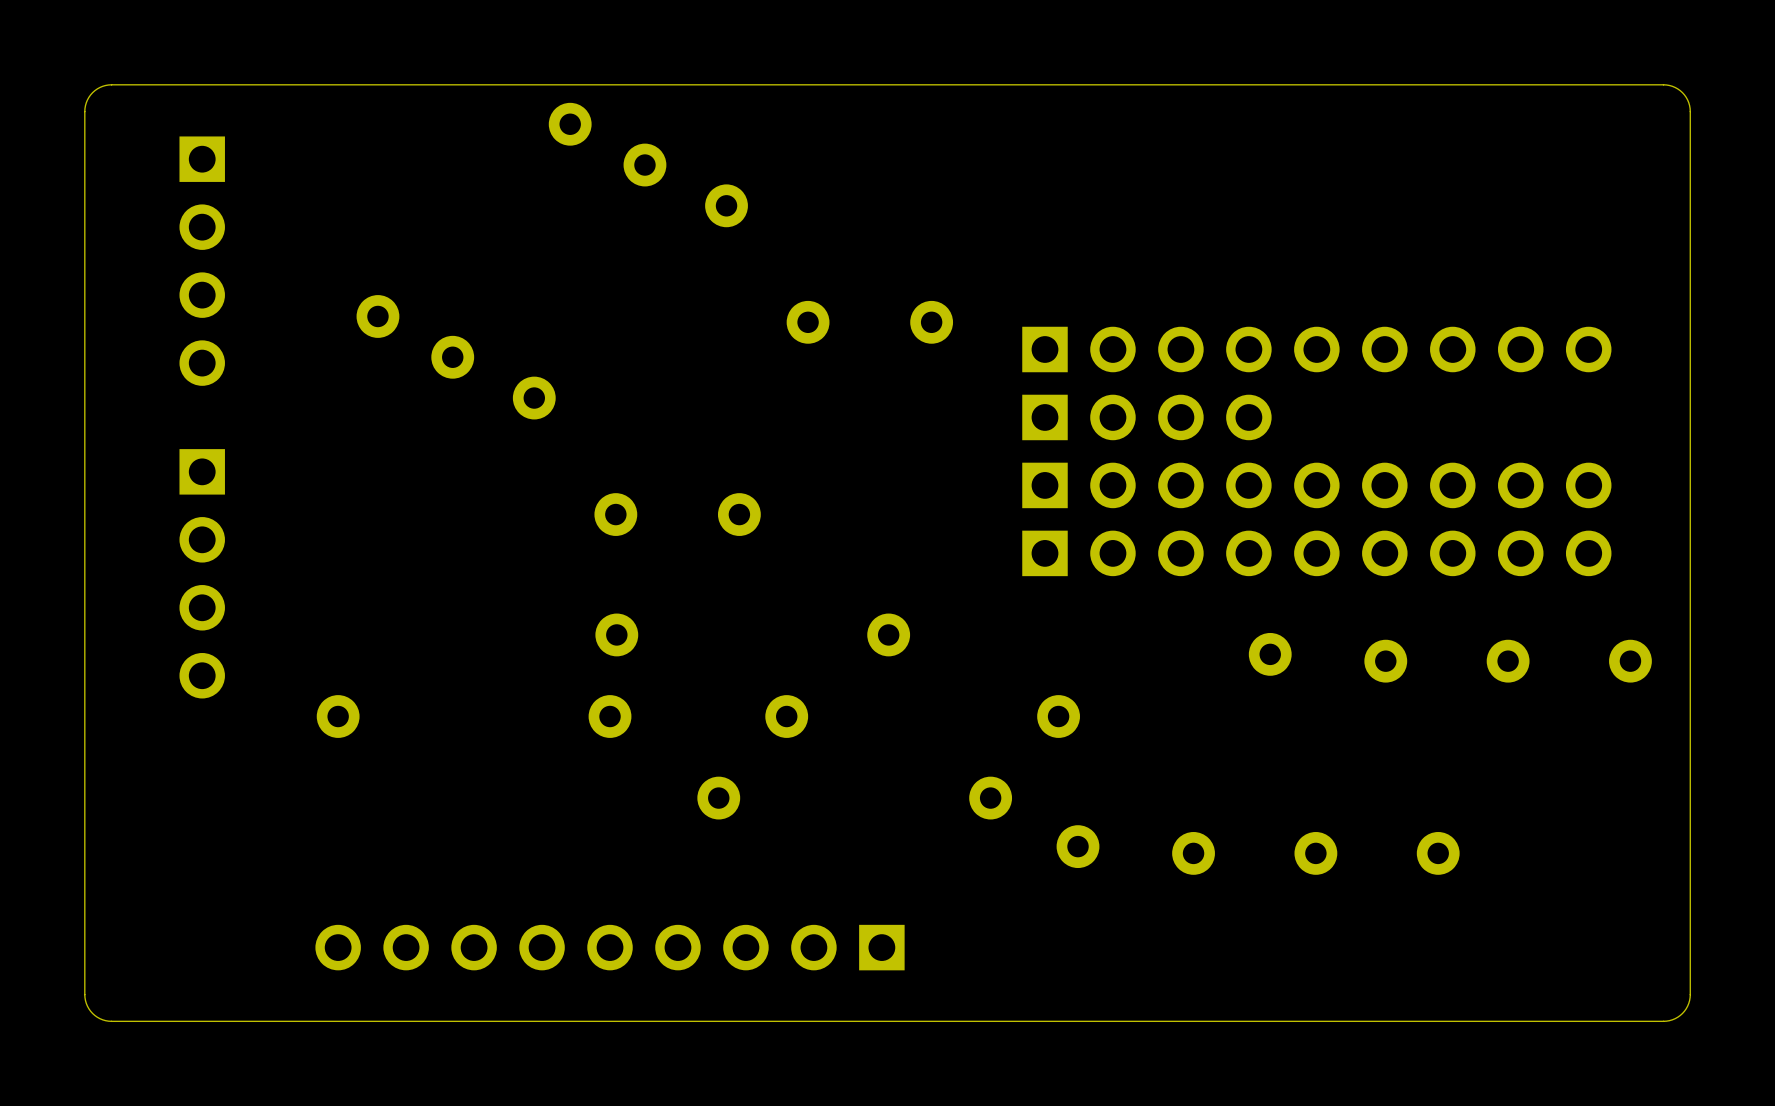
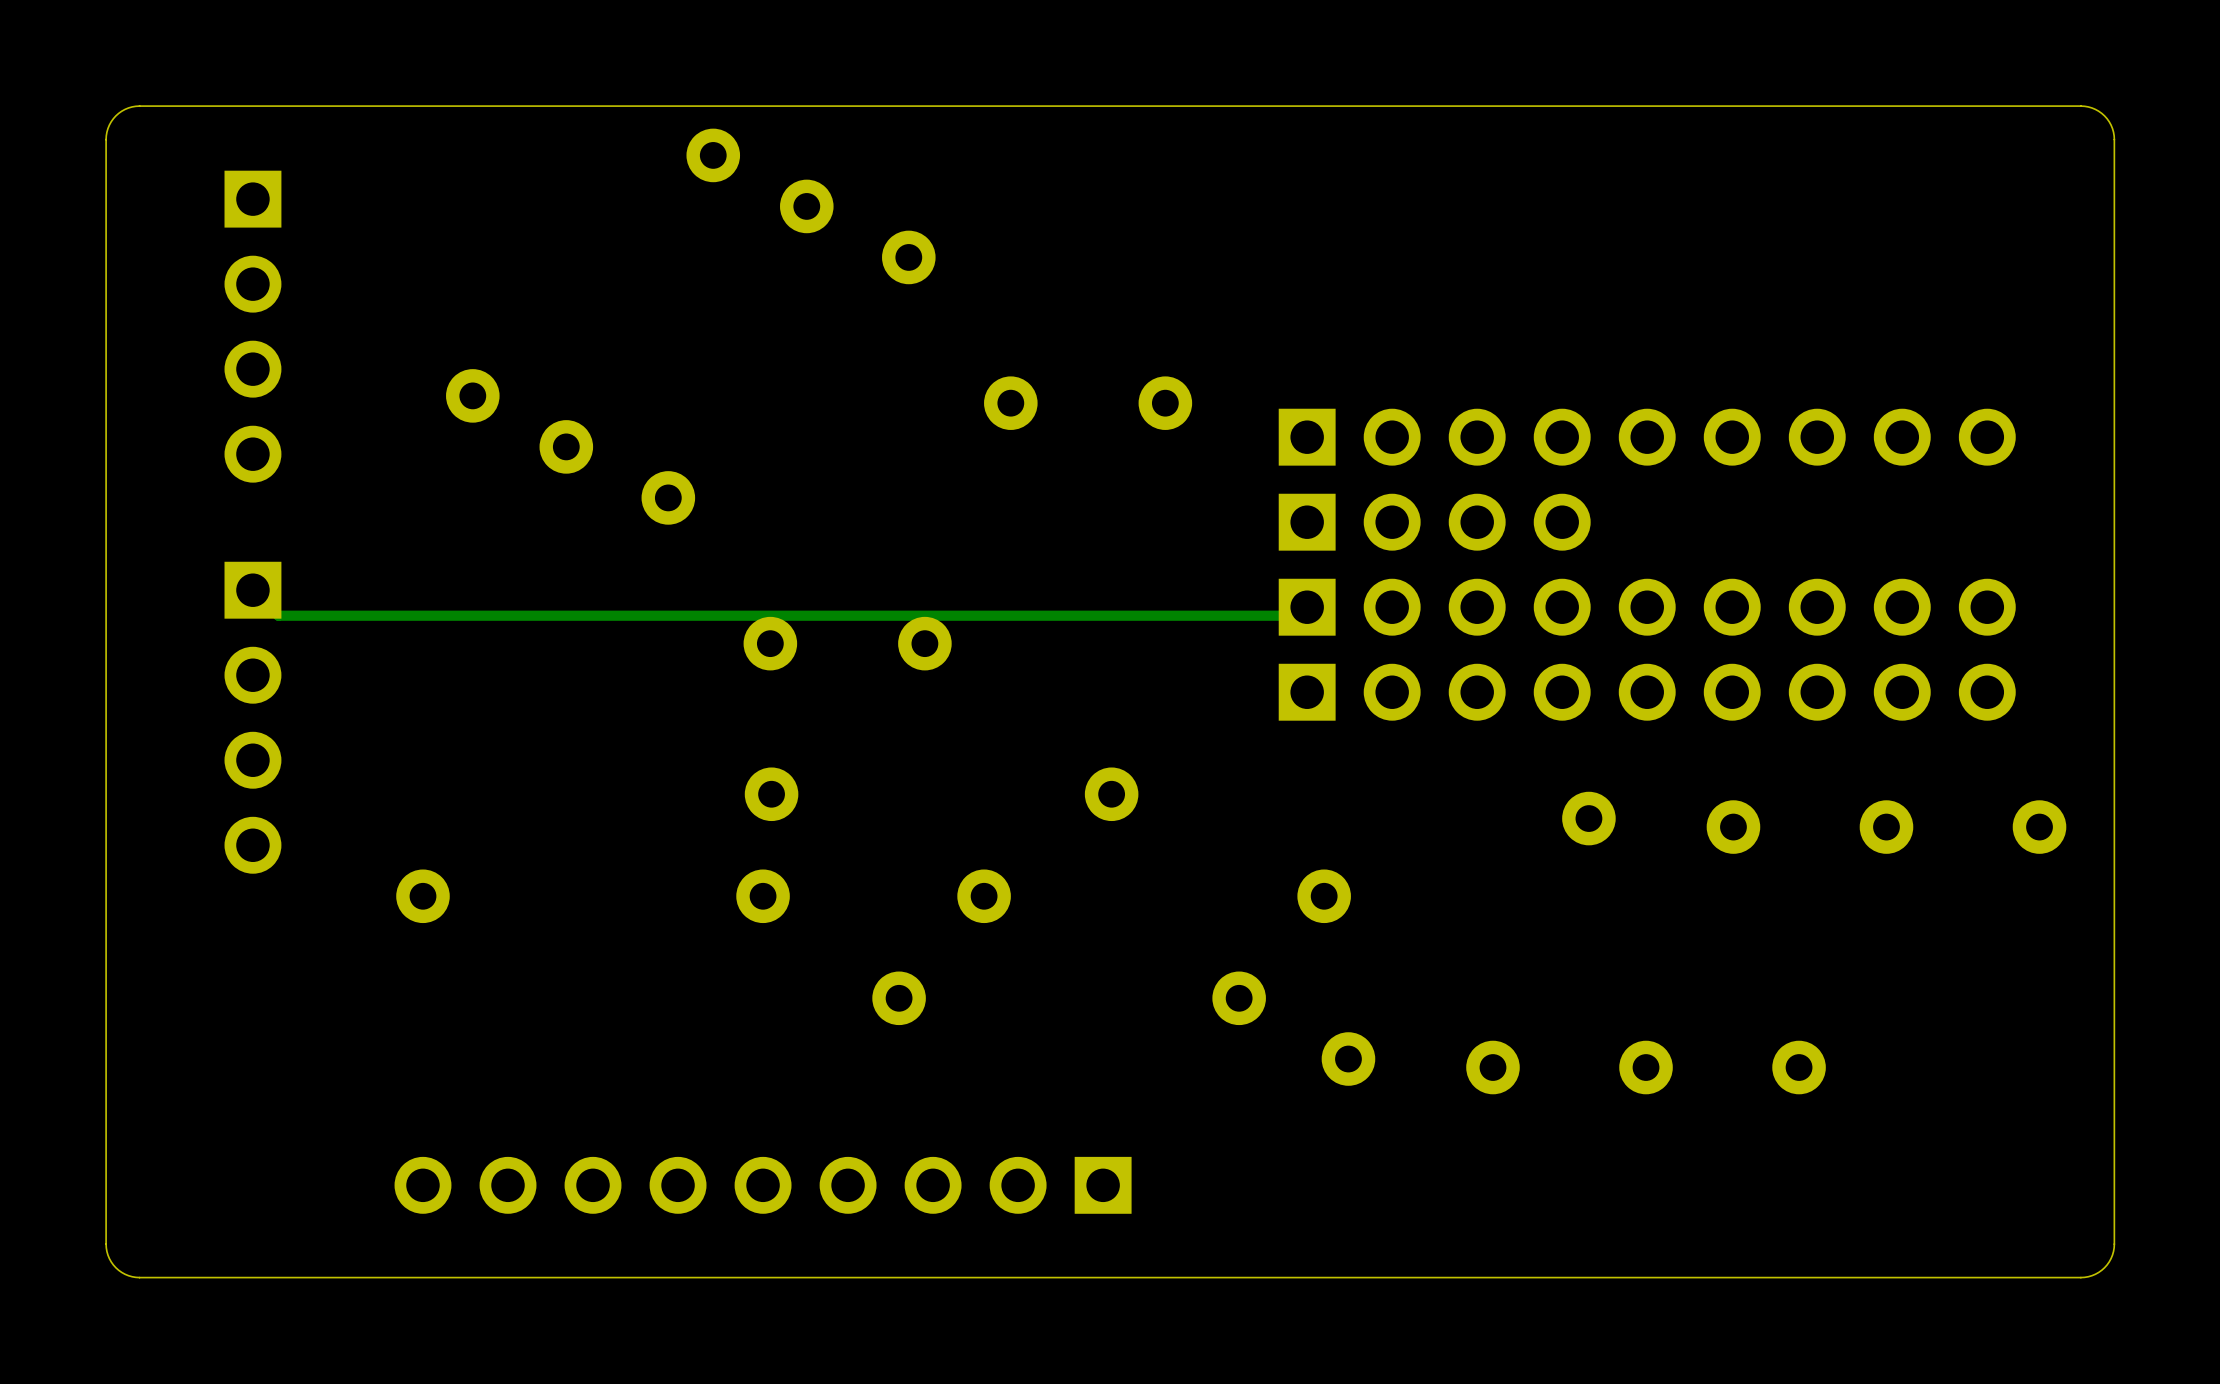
track: none -> (252, 590) (278, 615) (1298, 615) (1307, 607)

